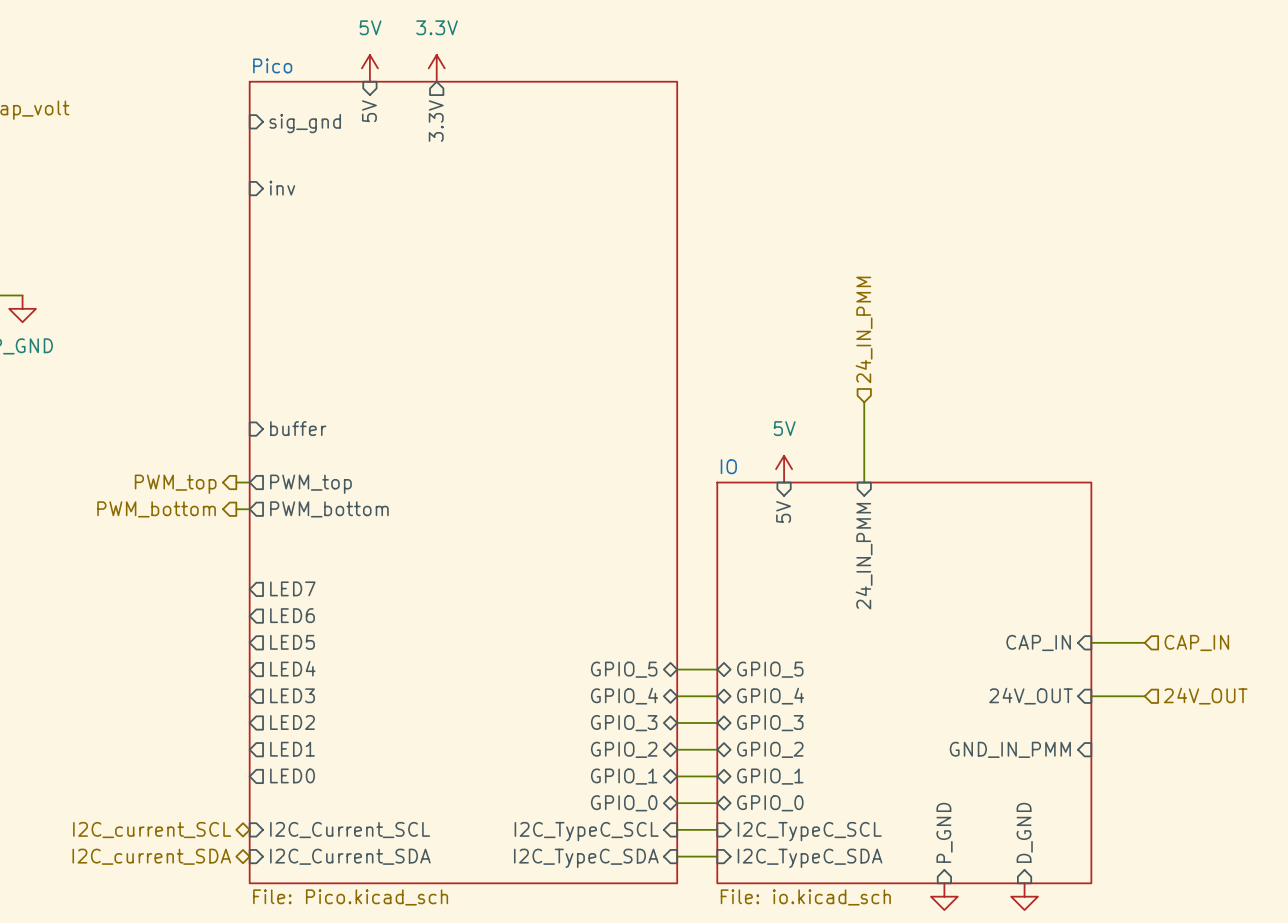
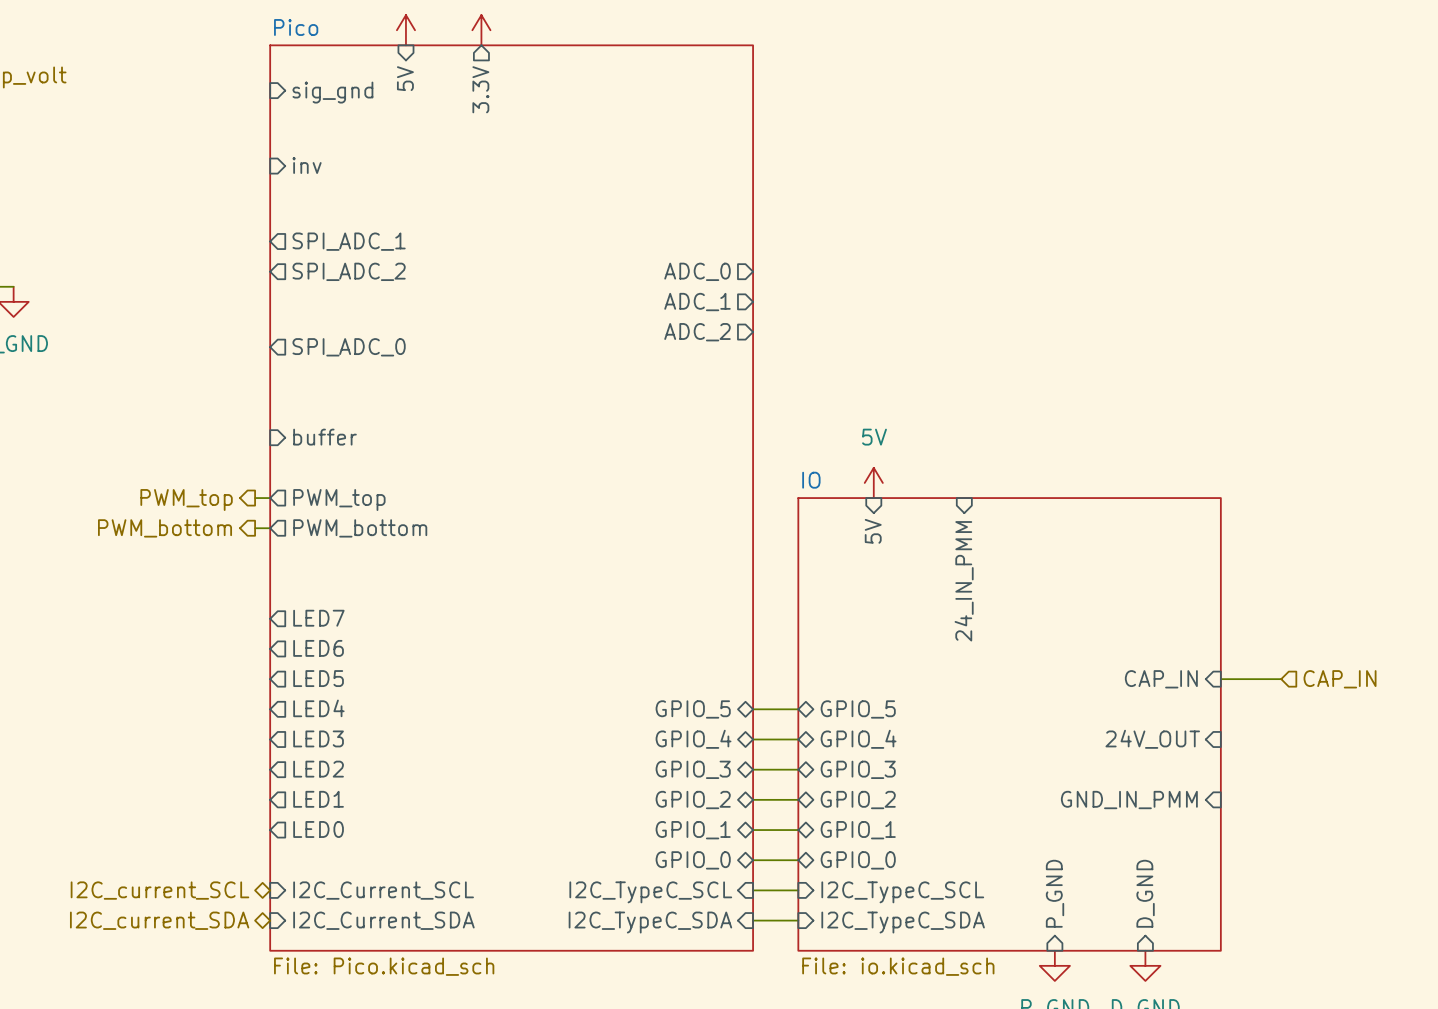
sheet pin: none -> SPI_ADC_1 (349, 241)
sheet pin: none -> SPI_ADC_2 (349, 271)
sheet pin: none -> ADC_0 (697, 271)
sheet pin: none -> ADC_1 (697, 302)
hierarchical label: 24_IN_PMM (864, 329) -> none
sheet pin: none -> ADC_2 (697, 332)
sheet pin: none -> SPI_ADC_0 (349, 347)
wire: (864, 402) (864, 482) -> none
wire: (1091, 696) (1144, 696) -> none
hierarchical label: 24V_OUT (1205, 696) -> none

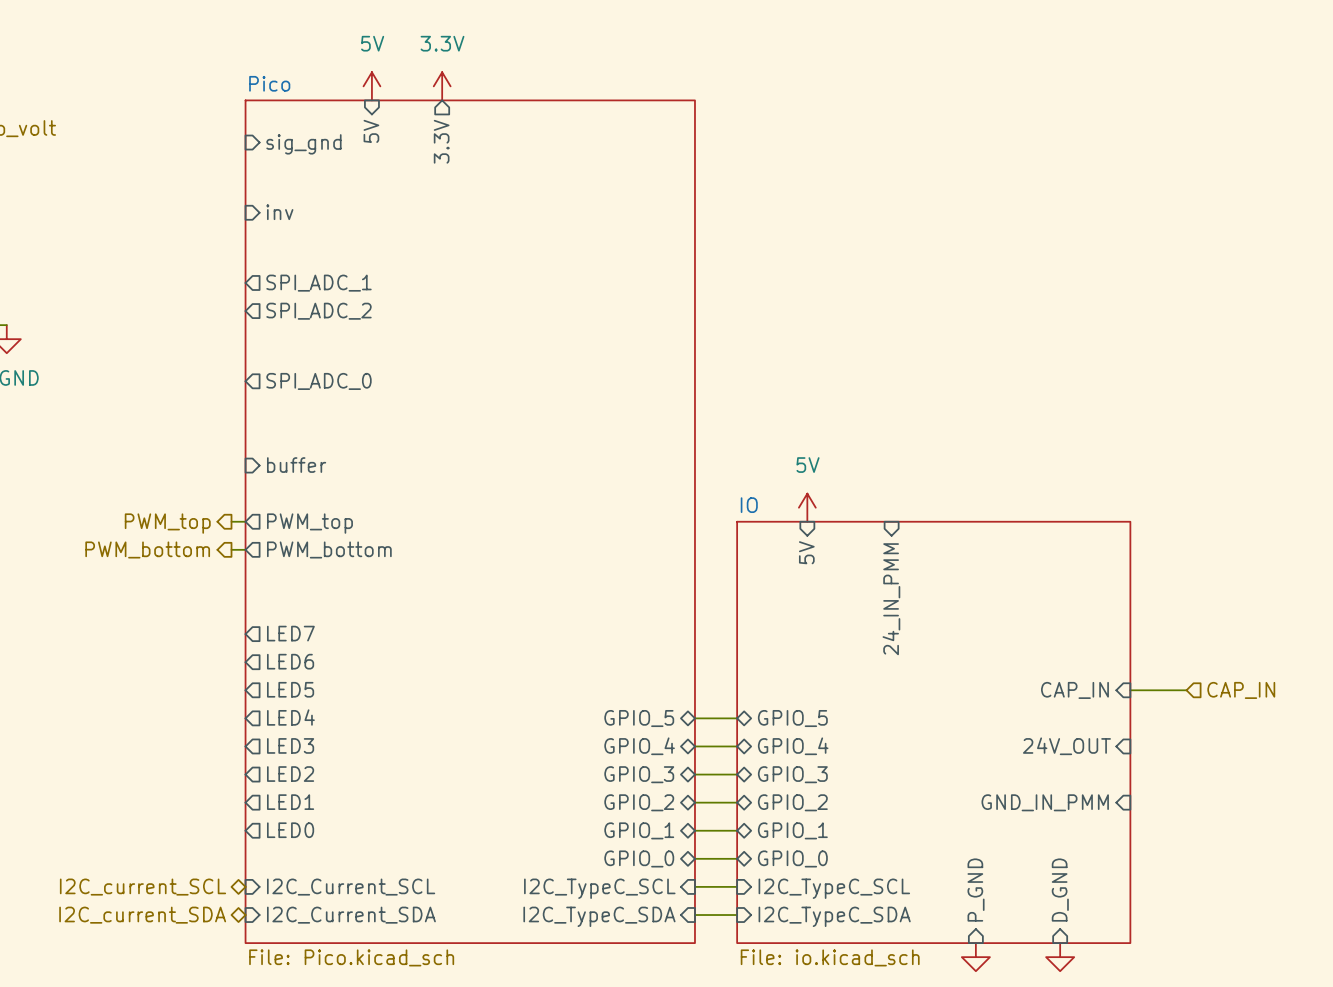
sheet pin: ADC_0 (697, 271) -> none
sheet pin: ADC_1 (697, 302) -> none
sheet pin: ADC_2 (697, 332) -> none

